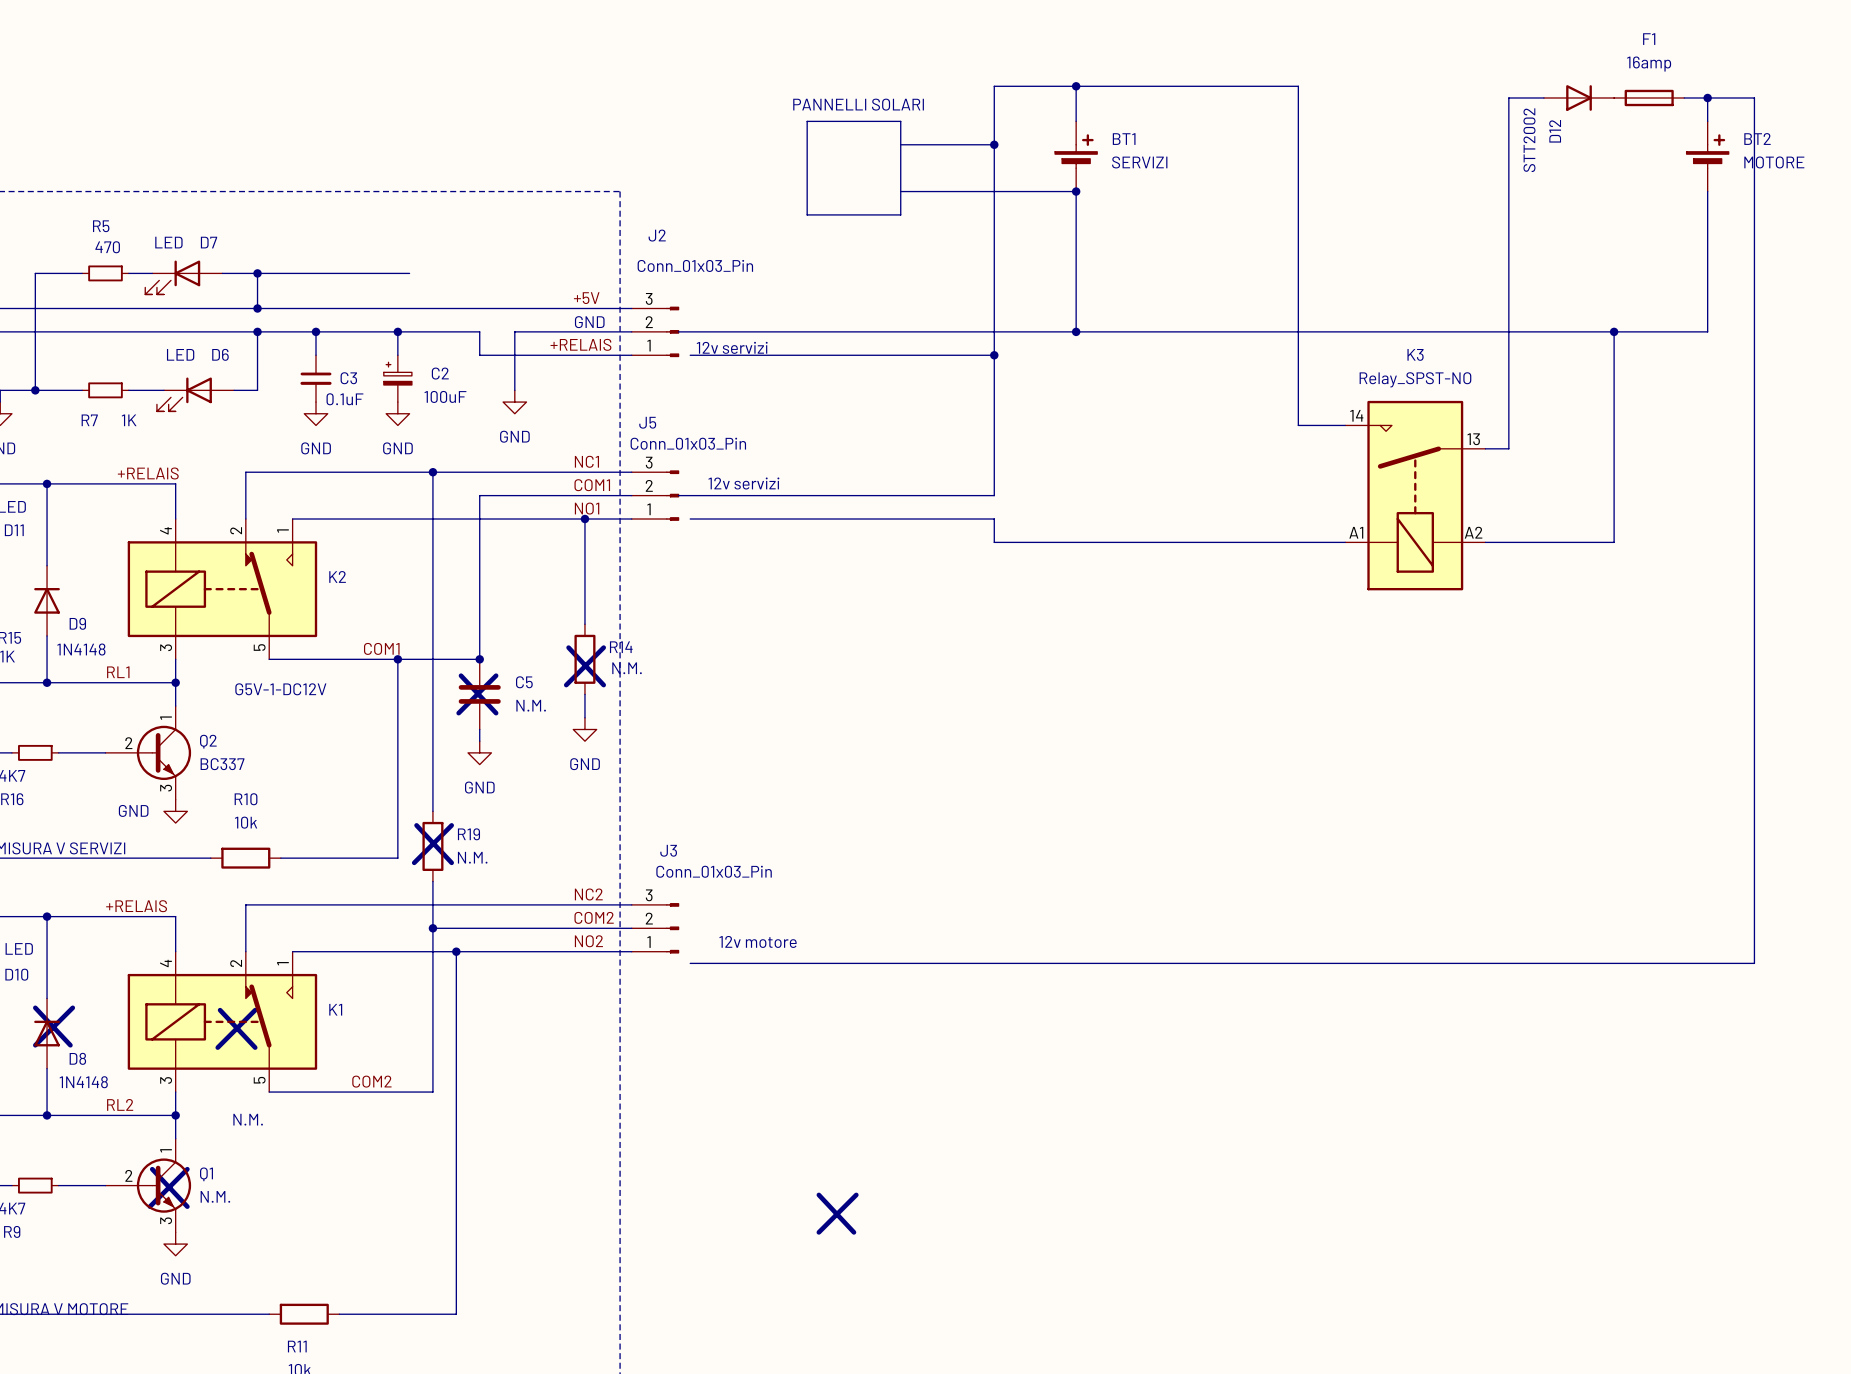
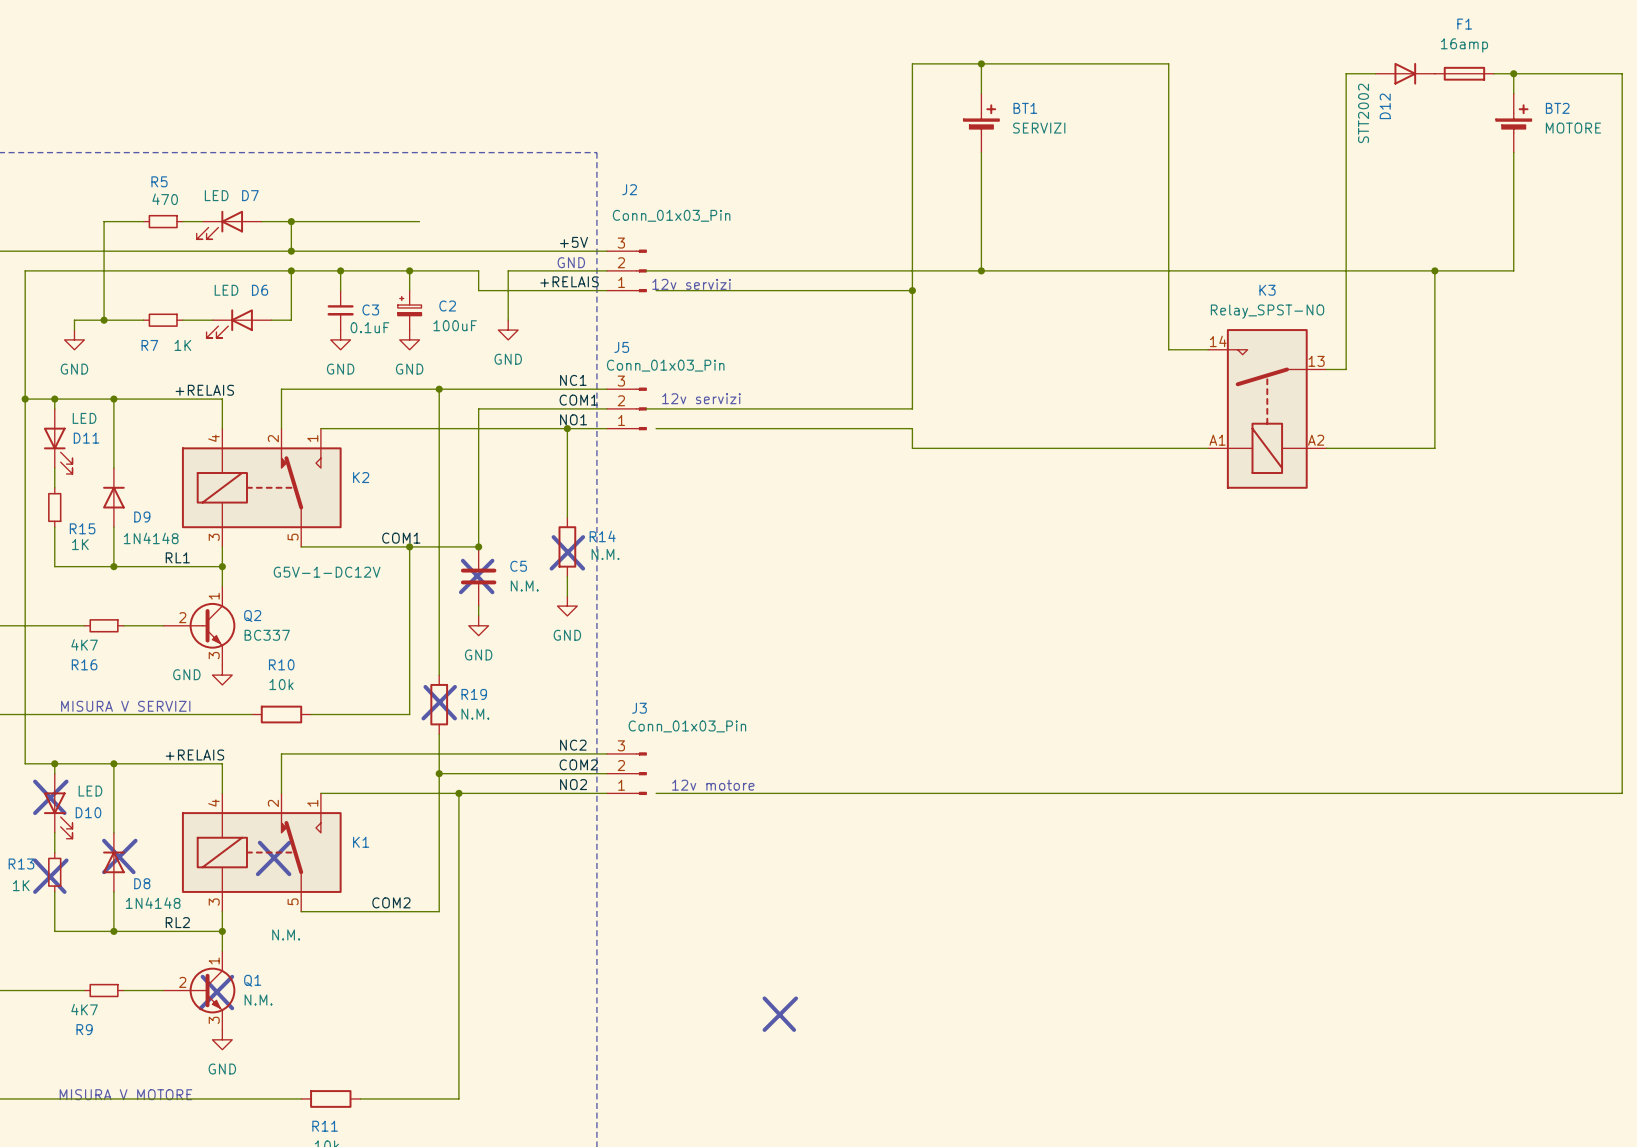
wire: (1754, 97) (1754, 963) (690, 963) -> (1553, 73) (1622, 73) (1622, 793) (656, 793)
text: PANNELLI SOLARI (858, 104) -> none
line: (807, 121) (900, 121) (900, 214) (807, 214) (807, 121) -> none
wire: (900, 144) (994, 144) -> none
junction: (994, 144) -> none
wire: (900, 191) (1076, 191) -> none
junction: (1076, 191) -> none

